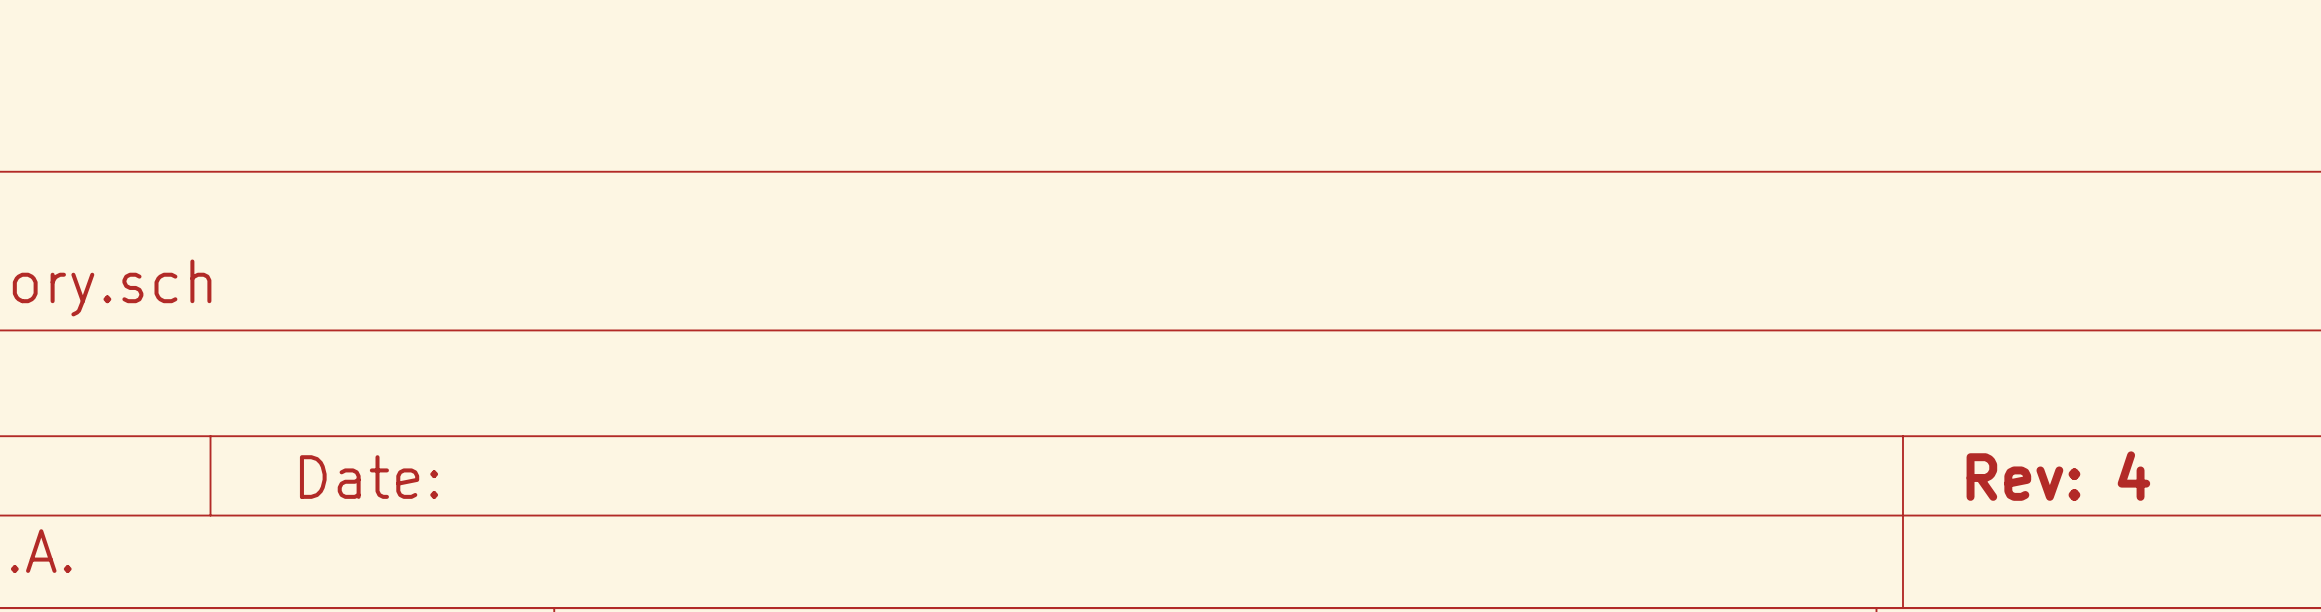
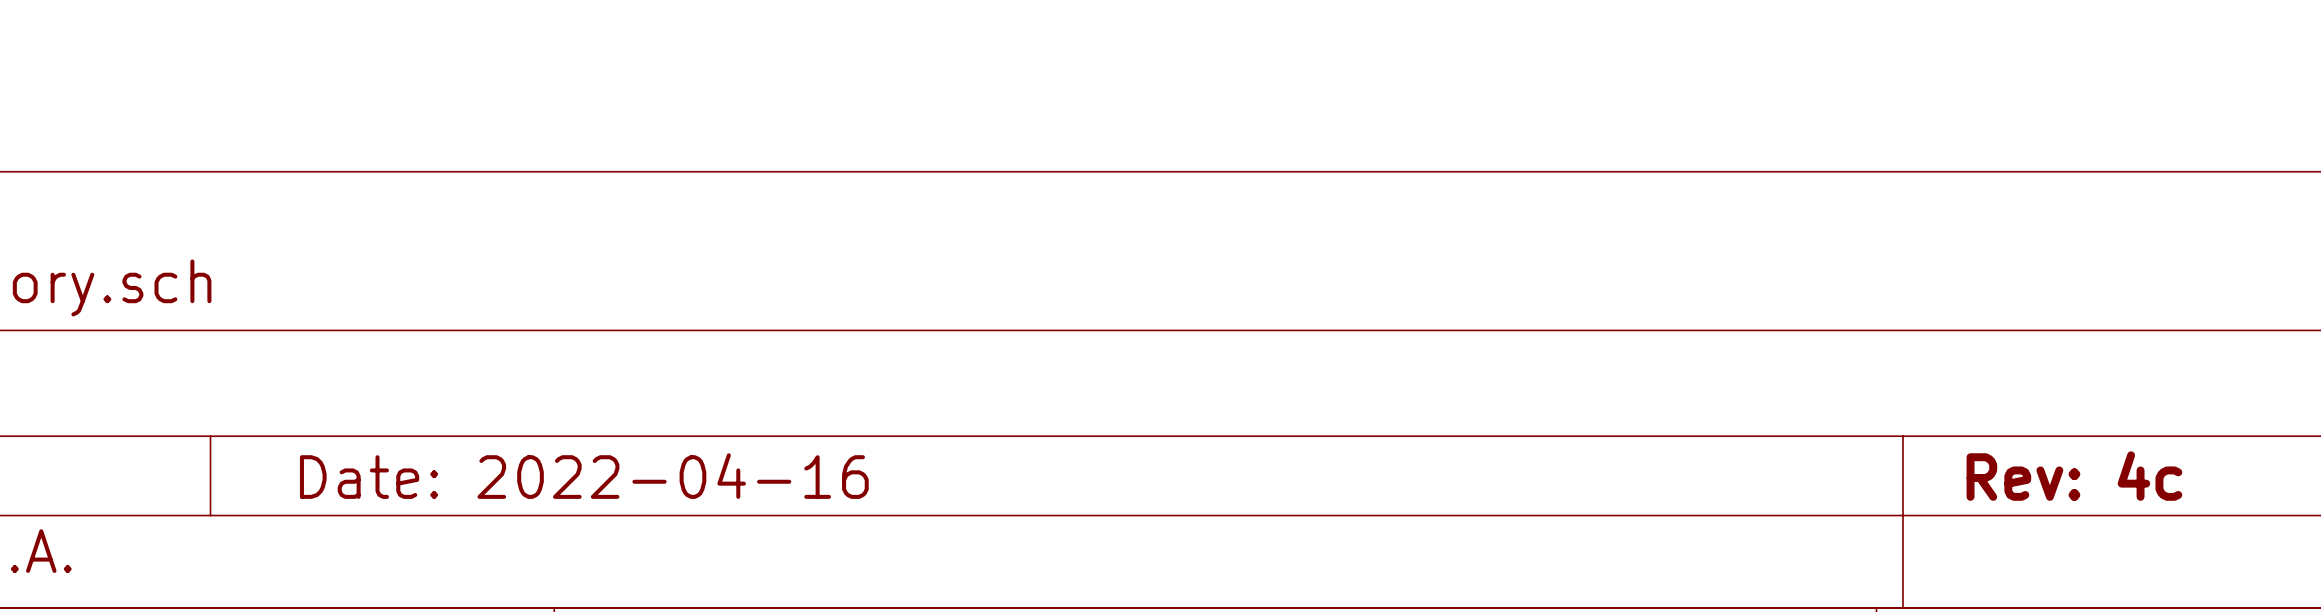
title block: Rev: 4 (2058, 476) -> Rev: 4c (2074, 476)
title block: Date: (369, 477) -> Date: 2022-04-16 (584, 476)

